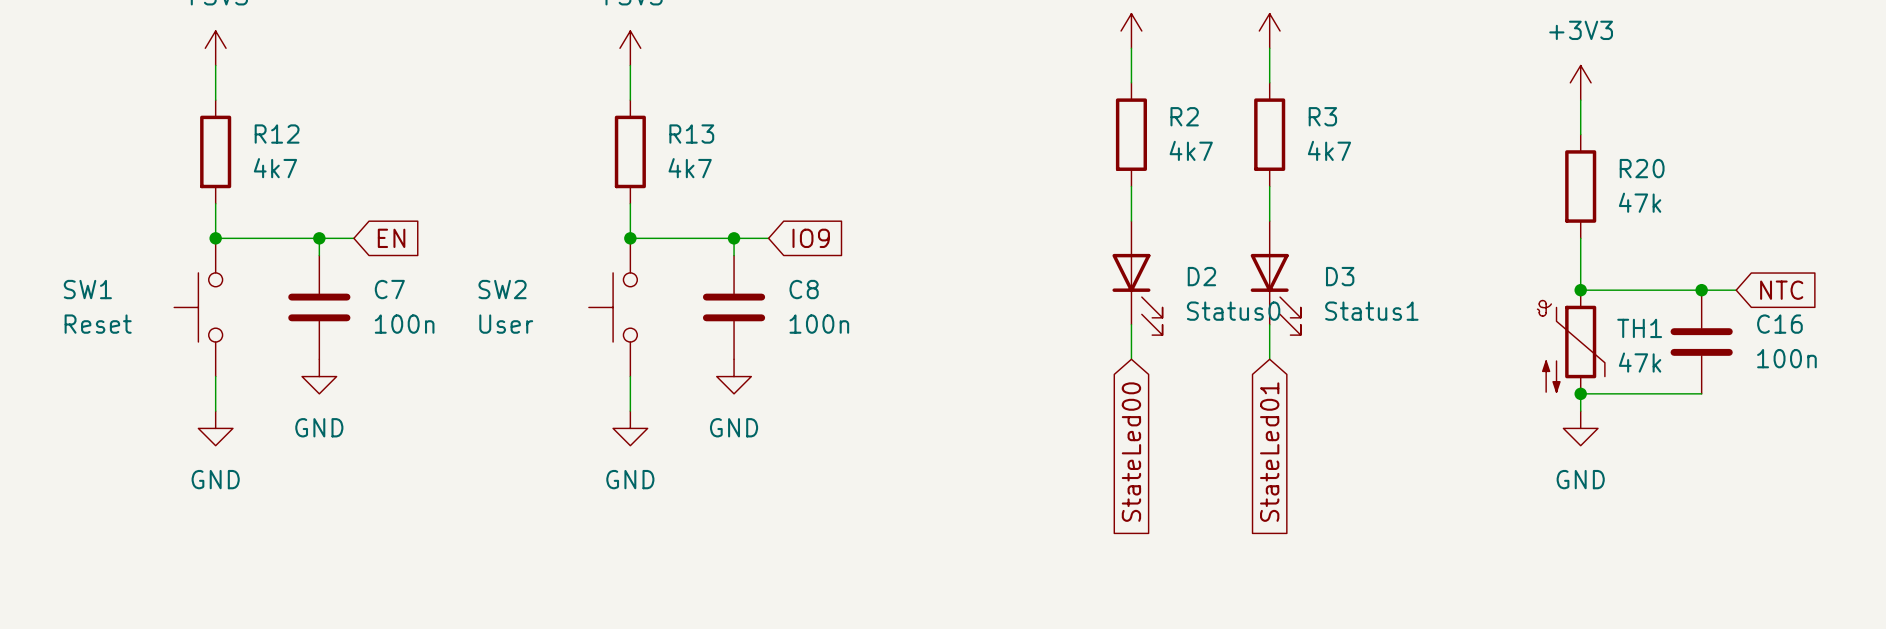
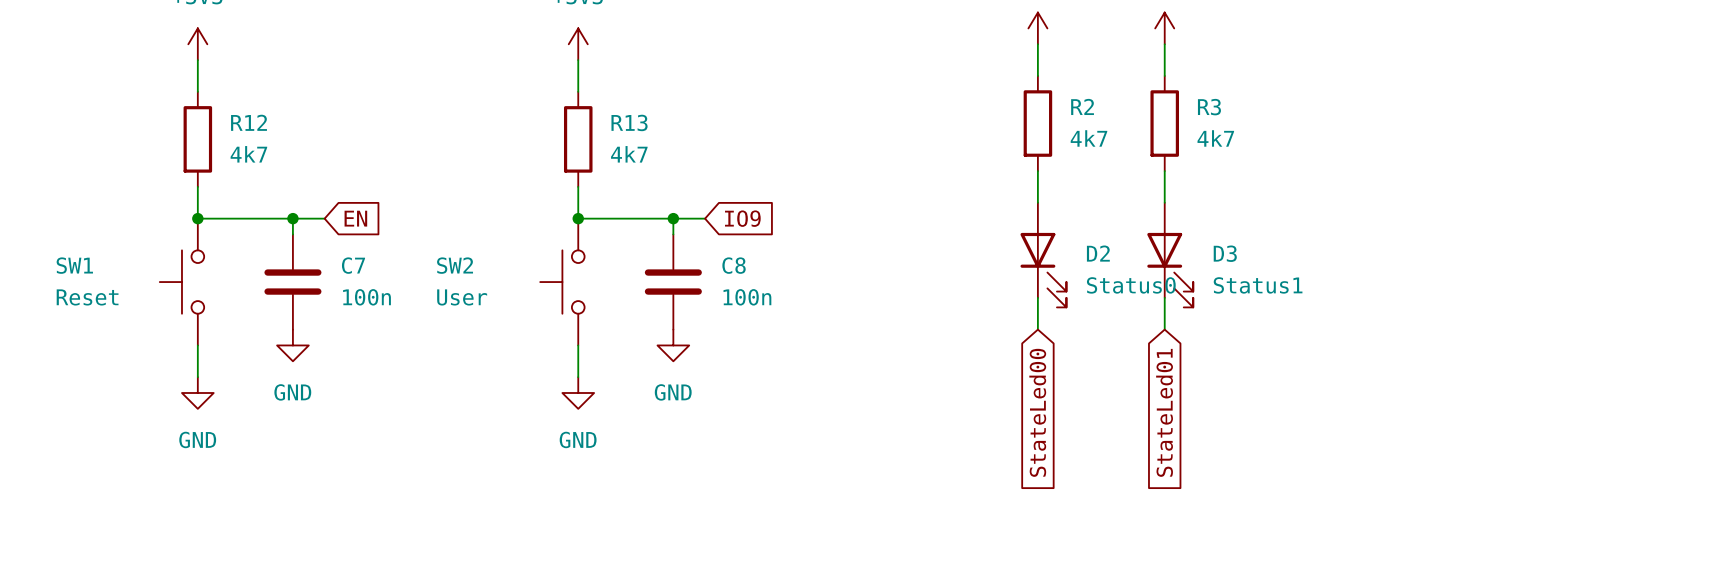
power symbol: +3V3 (1580, 82) -> none
wire: (1580, 100) (1580, 134) -> none
R20: 47k (1580, 186) -> none
wire: (1580, 238) (1580, 290) (1736, 290) -> none
junction: (1580, 290) -> none
junction: (1701, 290) -> none
global label: NTC (1781, 290) -> none
TH1: 47k (1571, 342) -> none
C16: 100n (1701, 342) -> none
junction: (1580, 393) -> none
wire: (1701, 393) (1580, 393) (1580, 411) -> none
power symbol: GND (1580, 428) -> none

